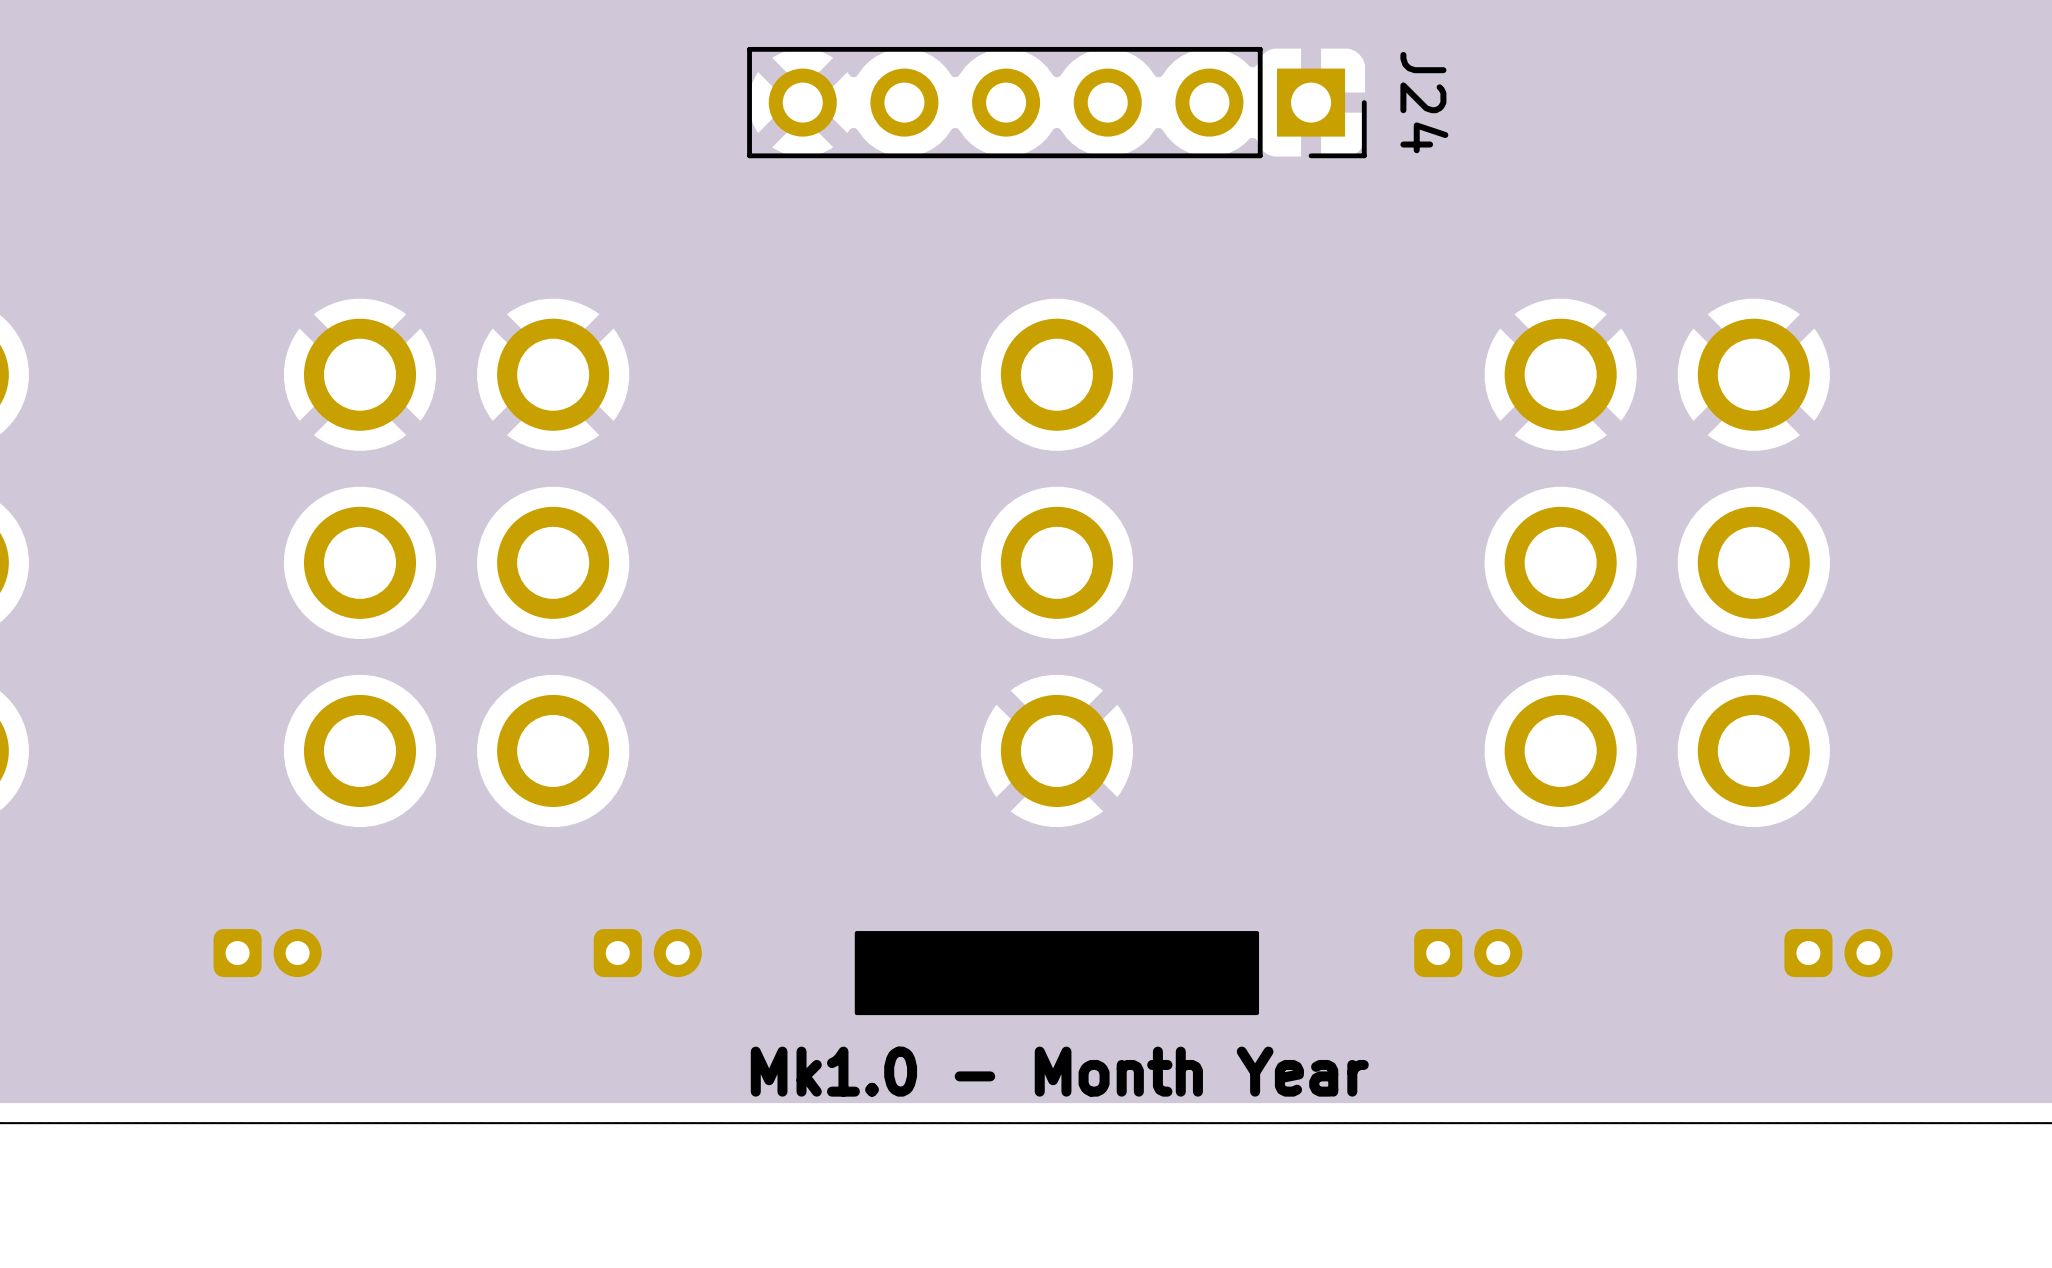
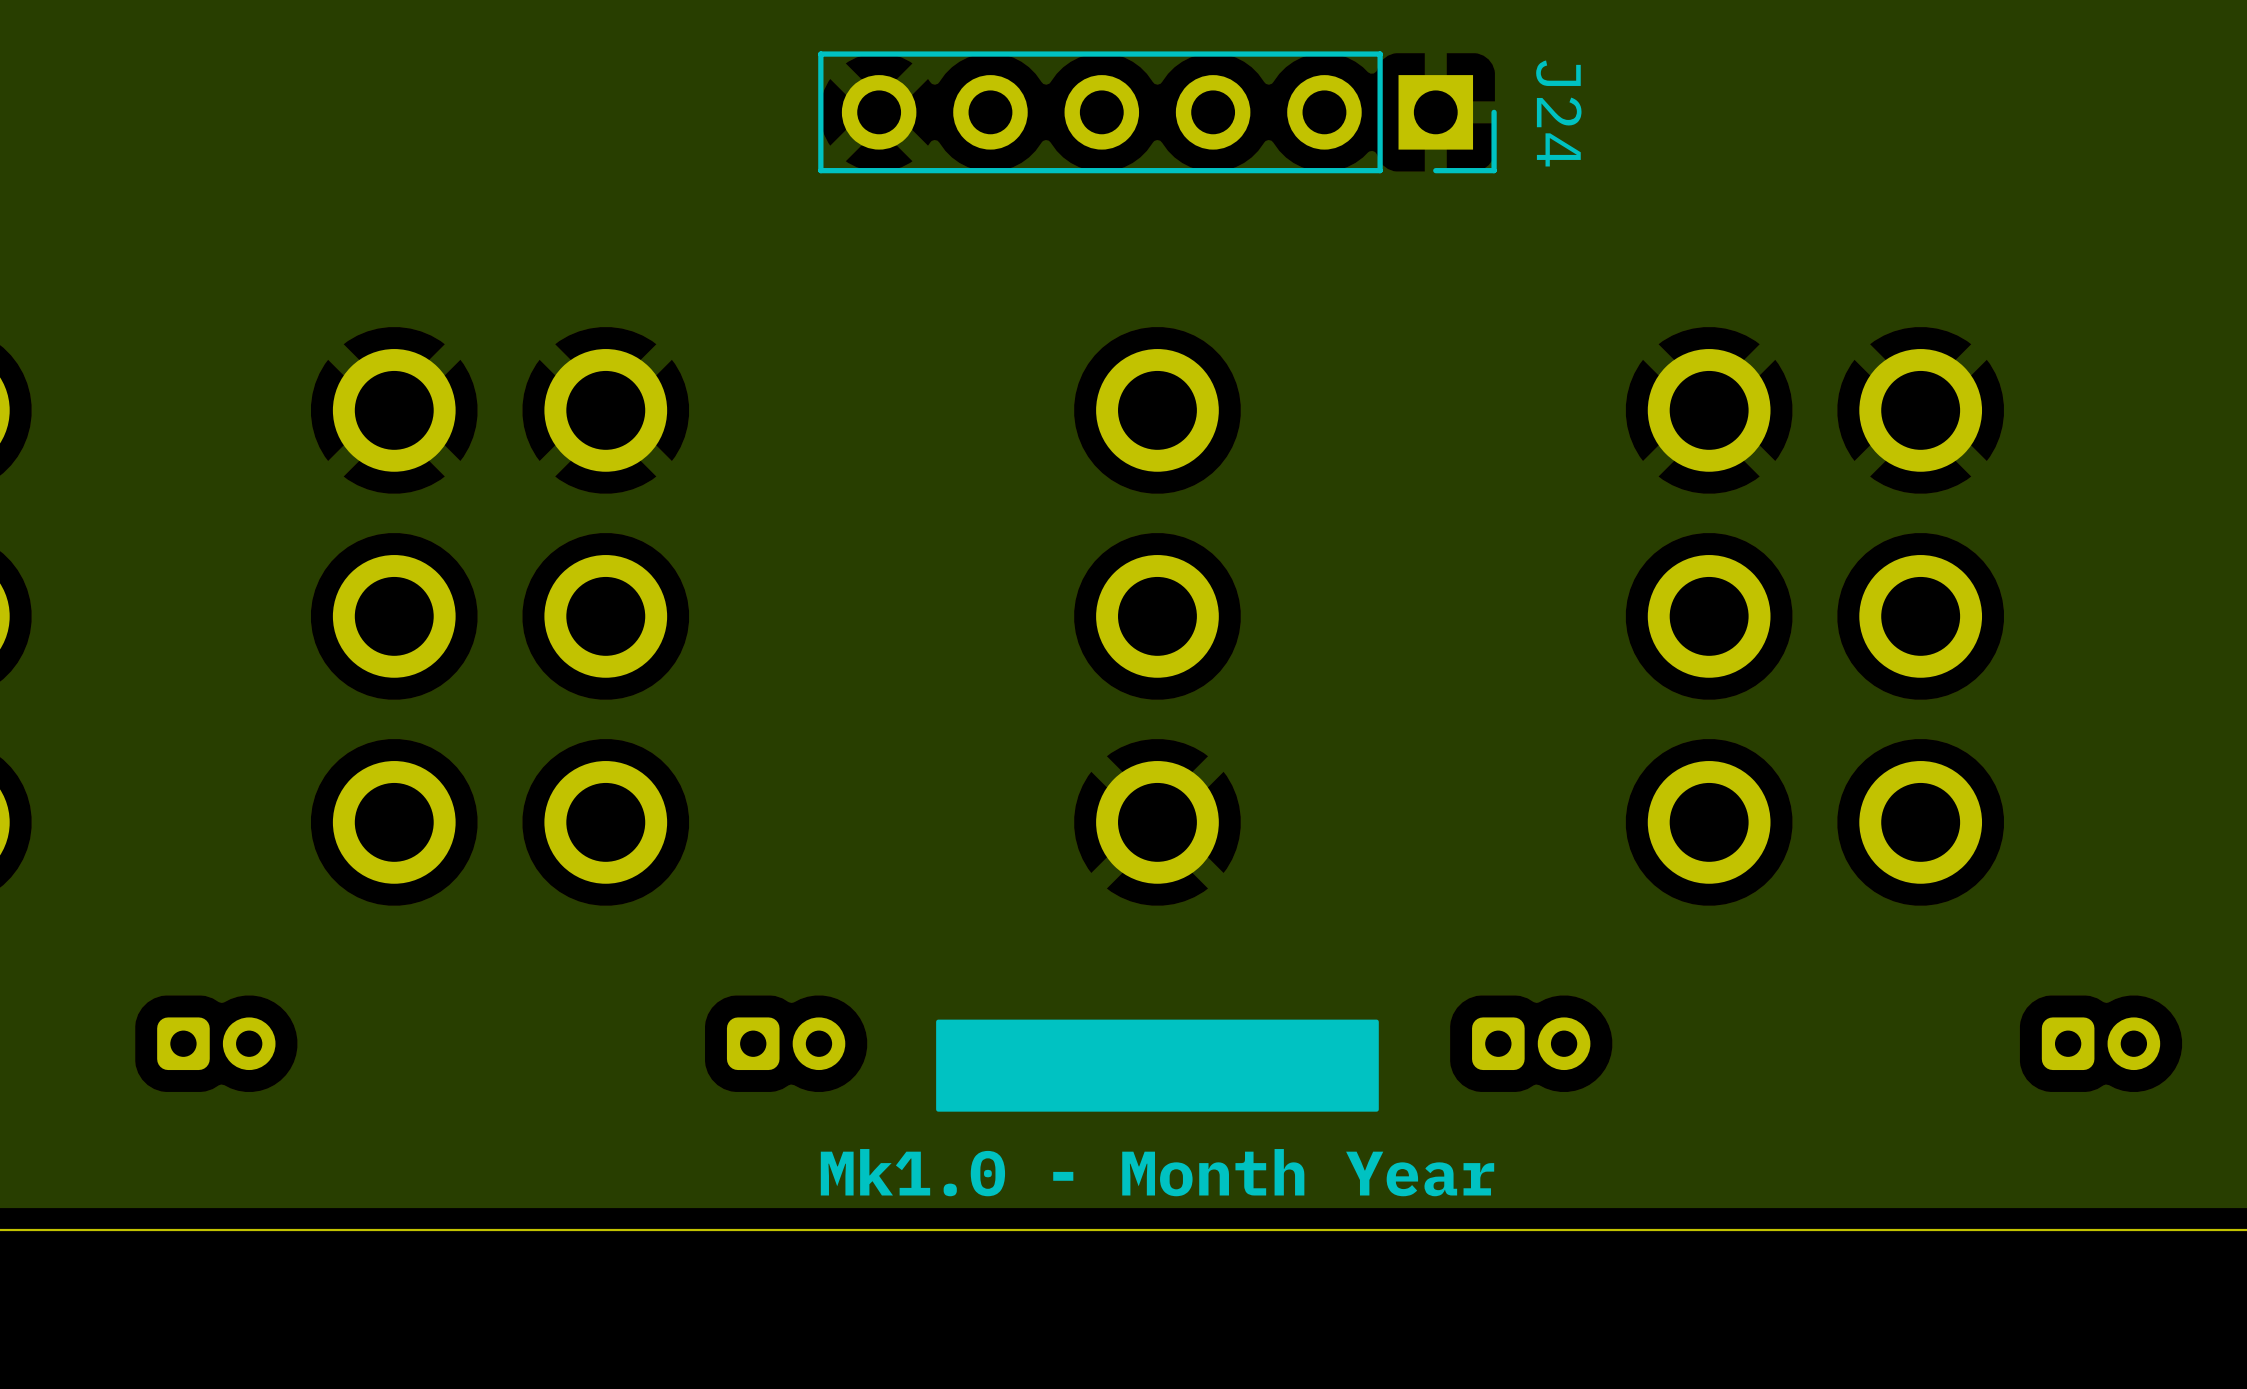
part position: (267, 953) -> (216, 1043)
part position: (647, 953) -> (786, 1043)
part position: (1468, 953) -> (1531, 1043)
part position: (1838, 953) -> (2101, 1043)

